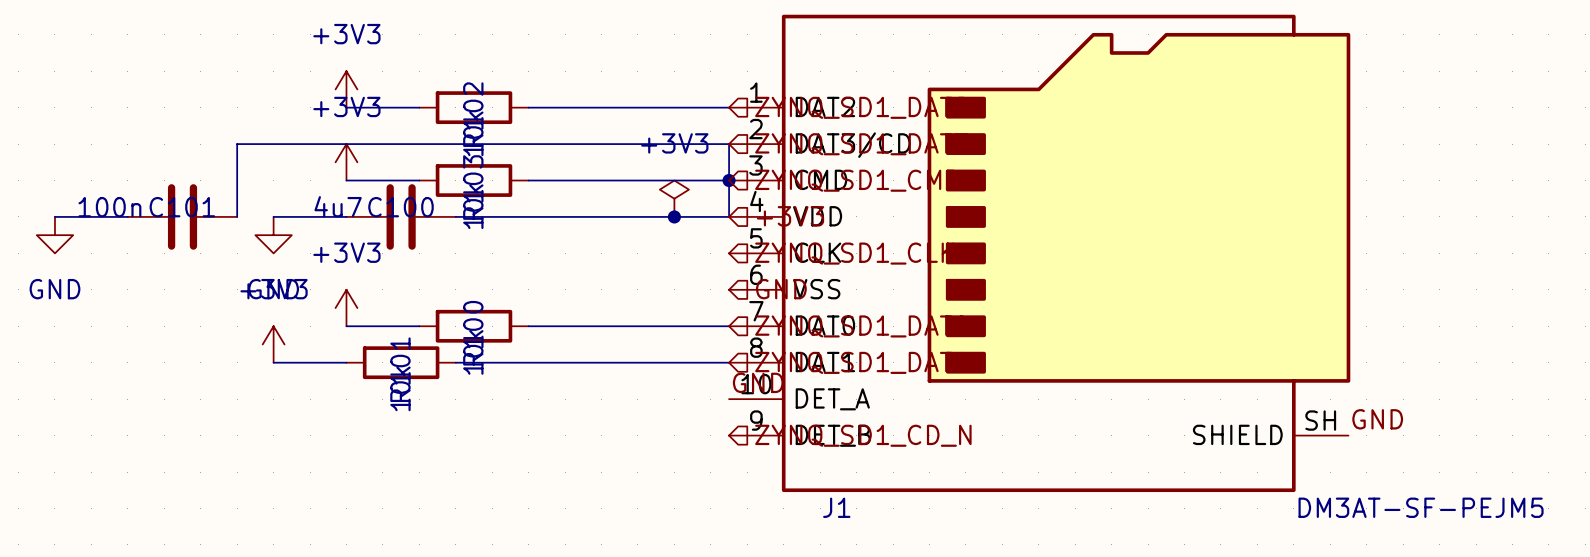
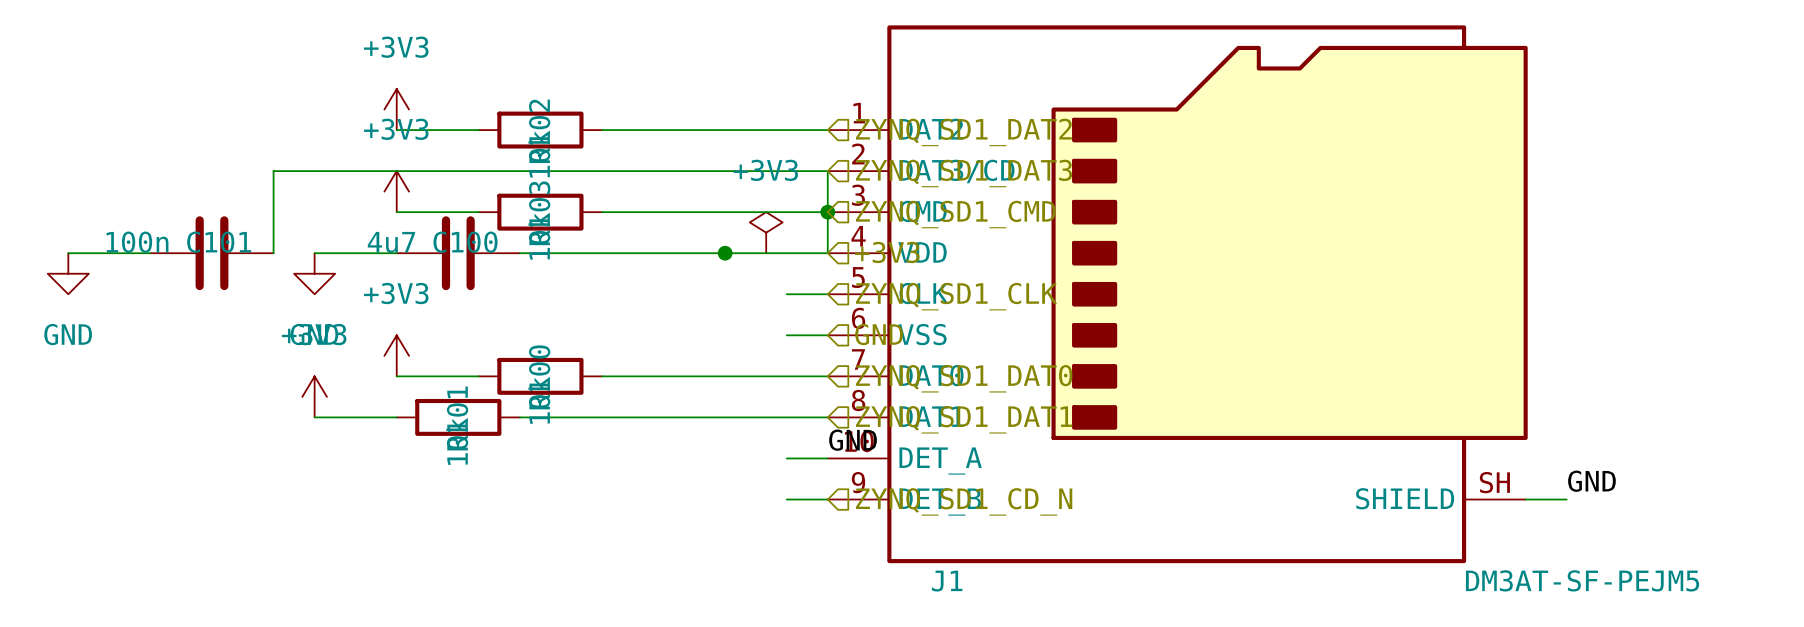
junction position: (674, 216) -> (725, 253)
wire: none -> (786, 294) (827, 294)
wire: none -> (786, 335) (827, 335)
wire: none -> (786, 458) (827, 458)
label position: GND (1377, 419) -> GND (1591, 481)
wire: none -> (786, 499) (827, 499)
wire: none -> (1525, 499) (1566, 499)

